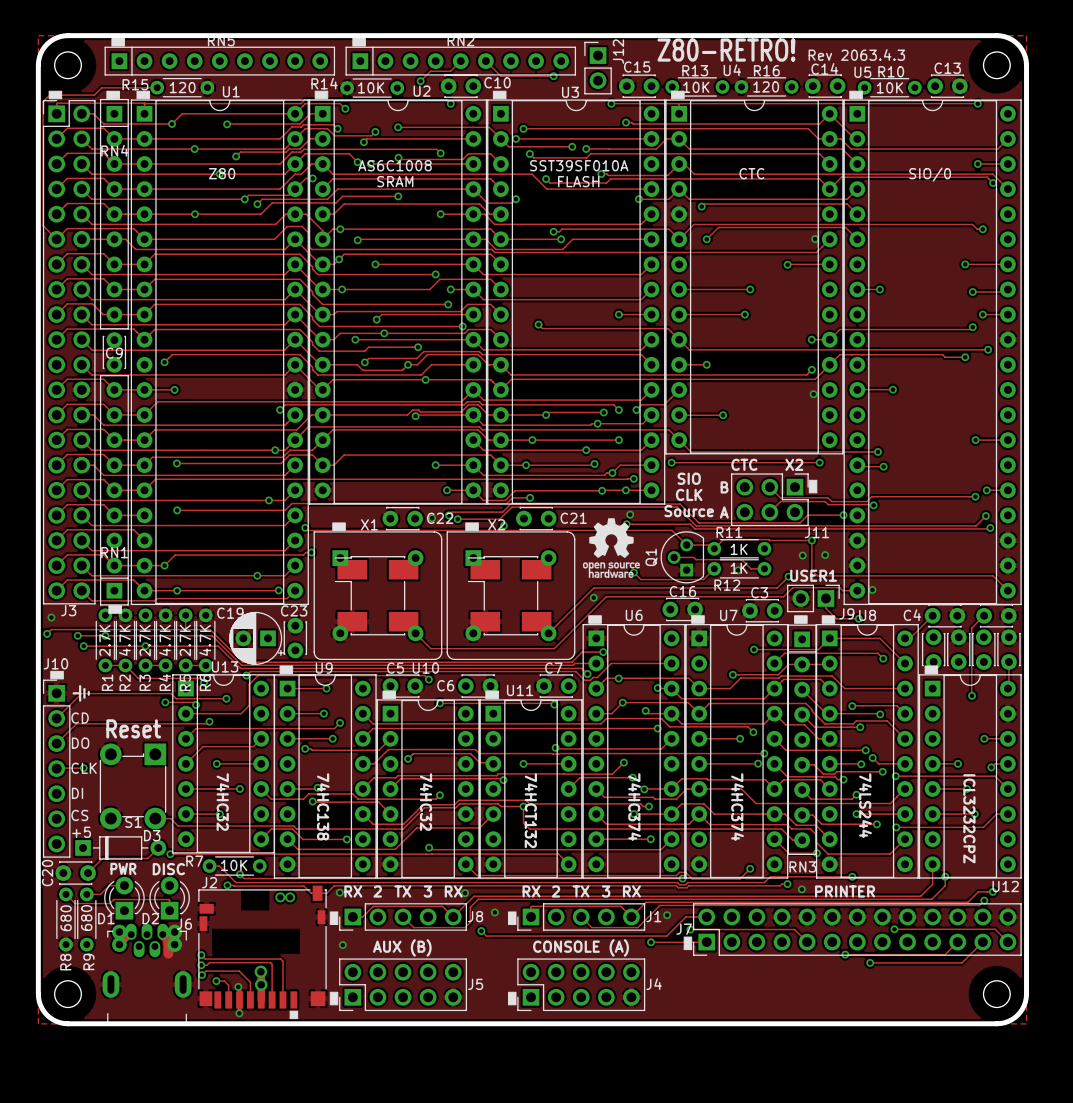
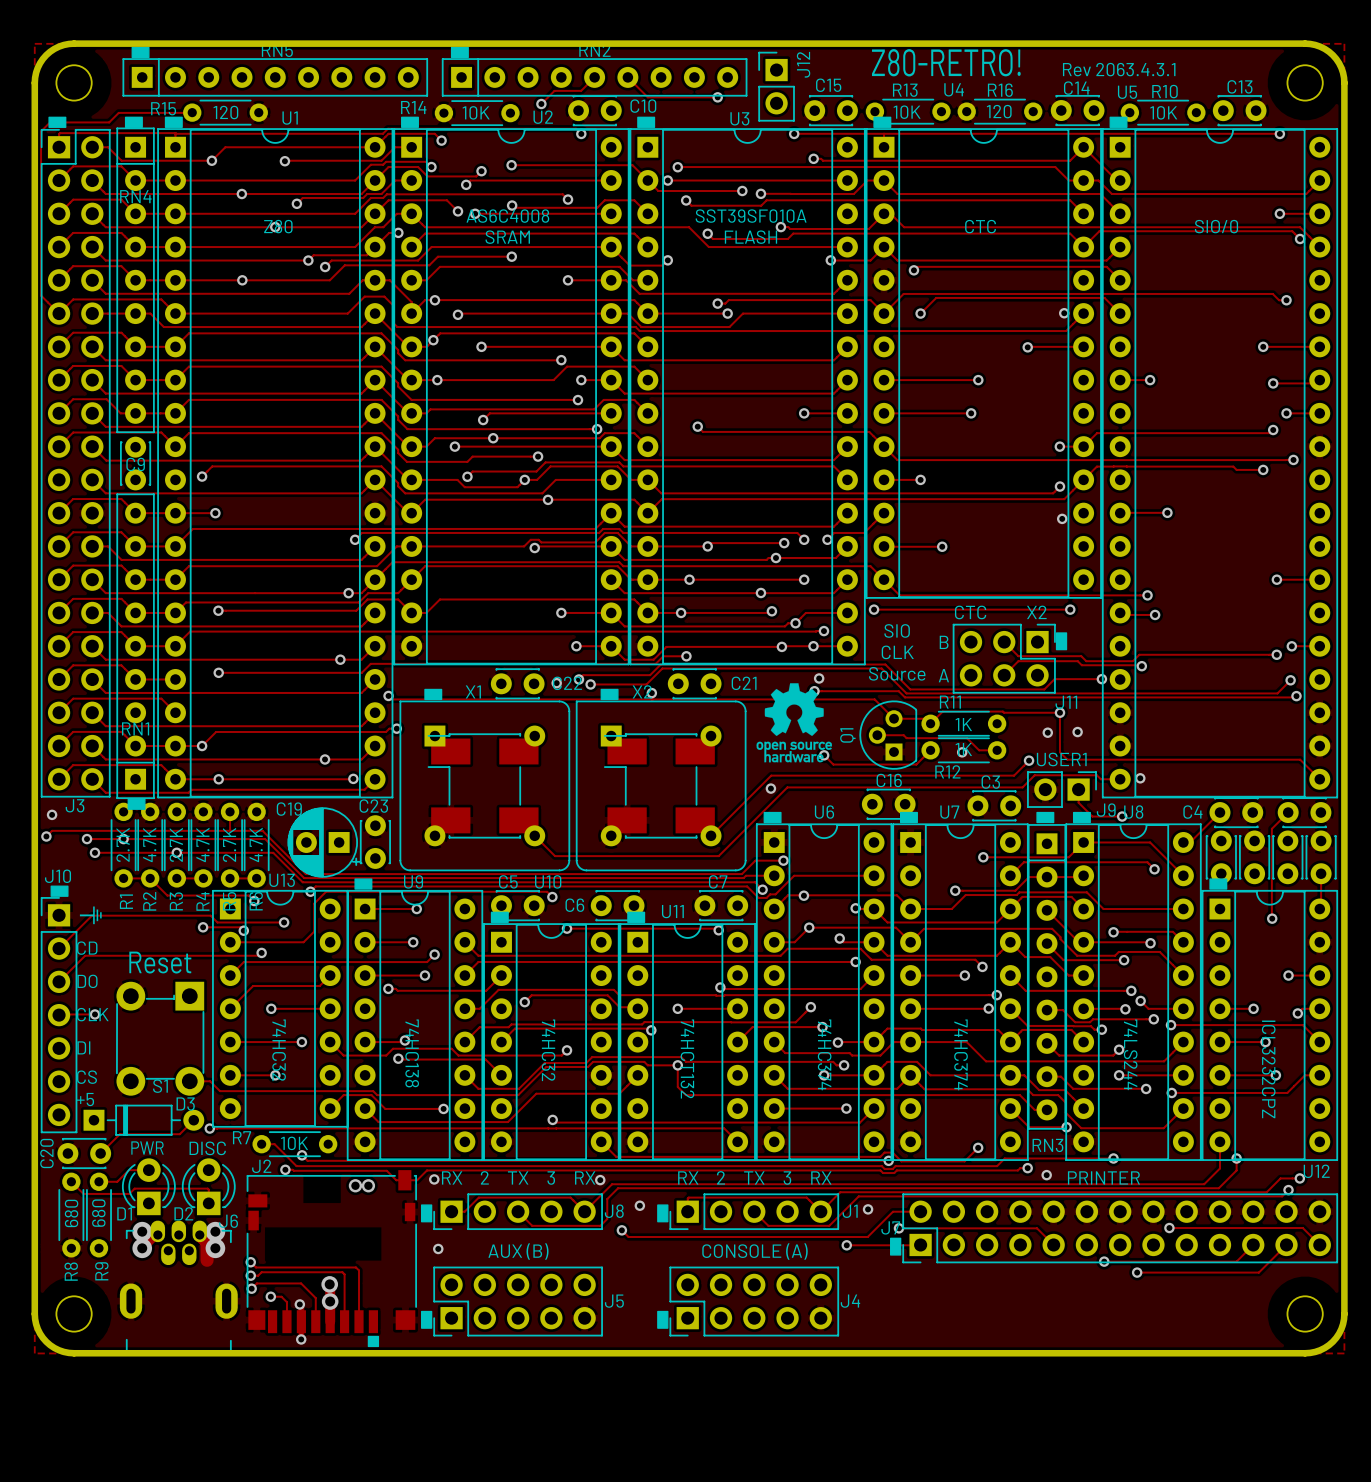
text: Rev 2063.4.3 (856, 54) -> Rev 2063.4.3.1 (1119, 69)
text: AS6C1008 (395, 165) -> AS6C4008 (507, 216)

